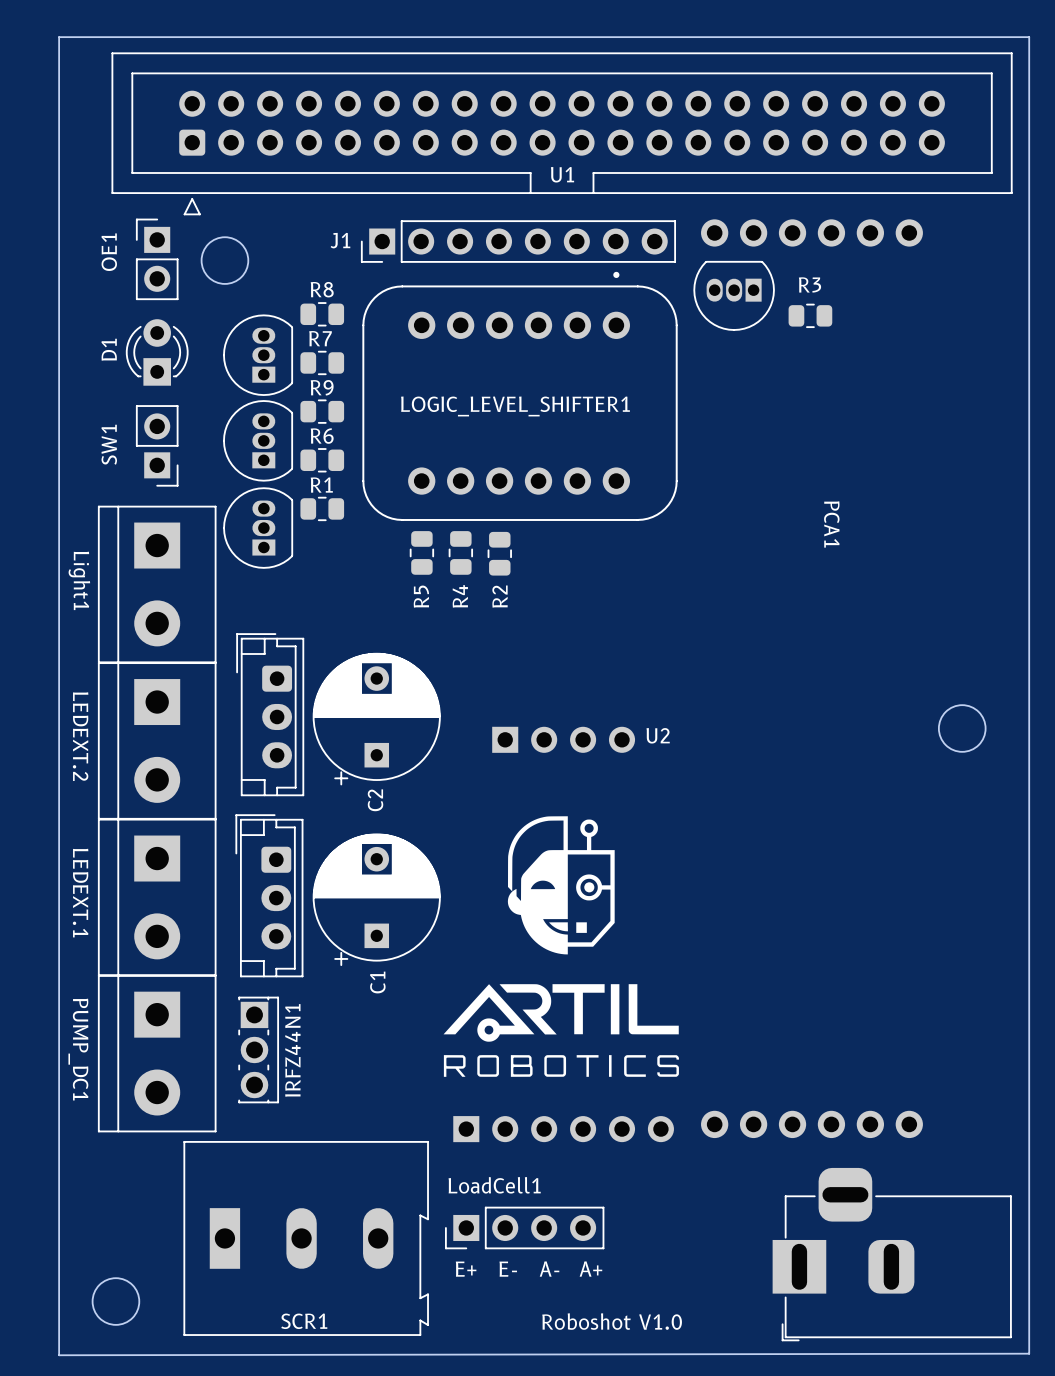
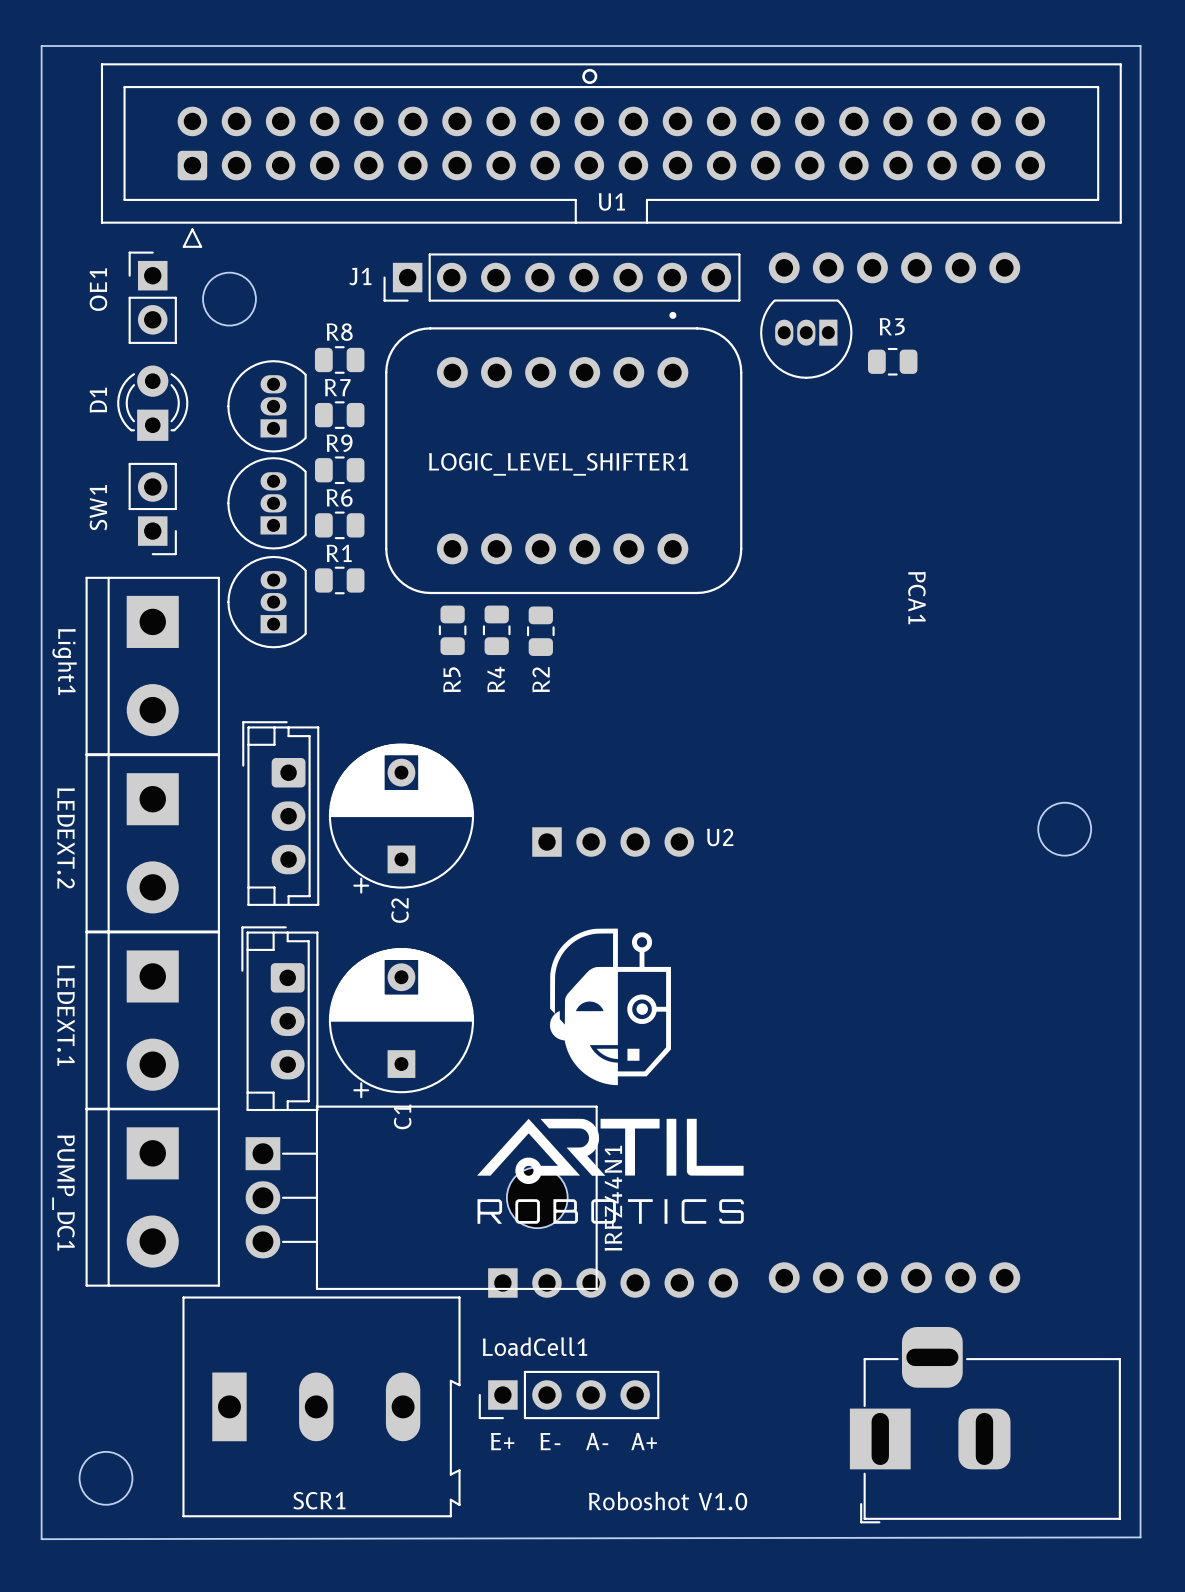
drawing: none -> [582, 68, 598, 84]
IRFZ44N1 footprint: [238, 996, 280, 1104] -> [245, 1105, 598, 1290]
IRFZ44N1 name position: IRFZ44N1 (292, 1050) -> IRFZ44N1 (613, 1198)

